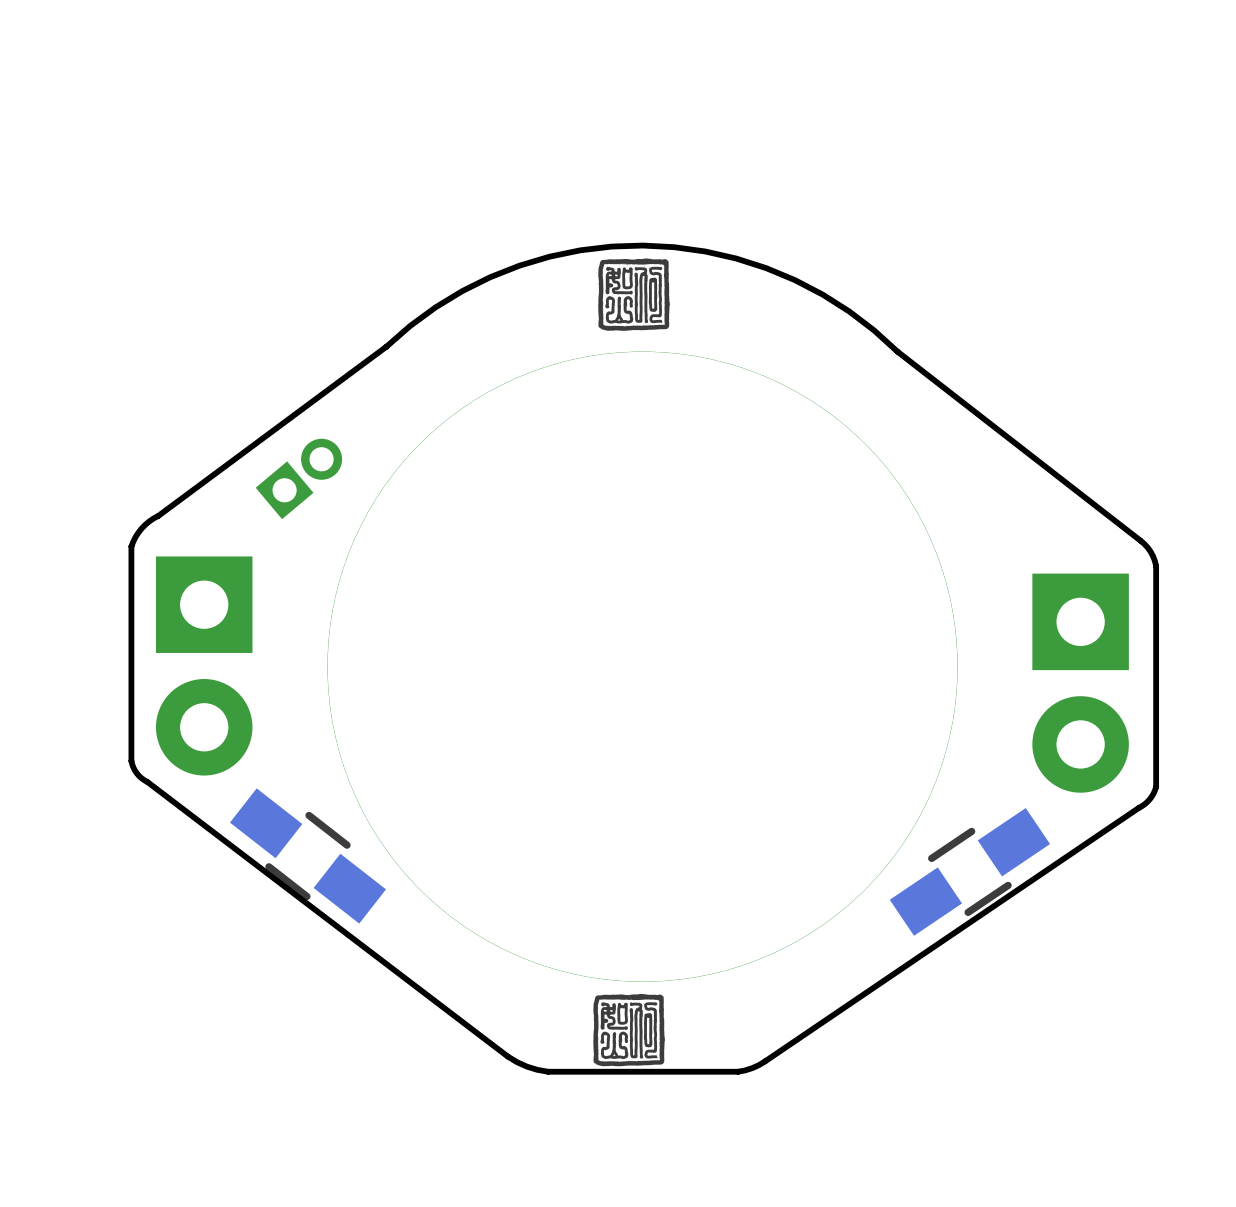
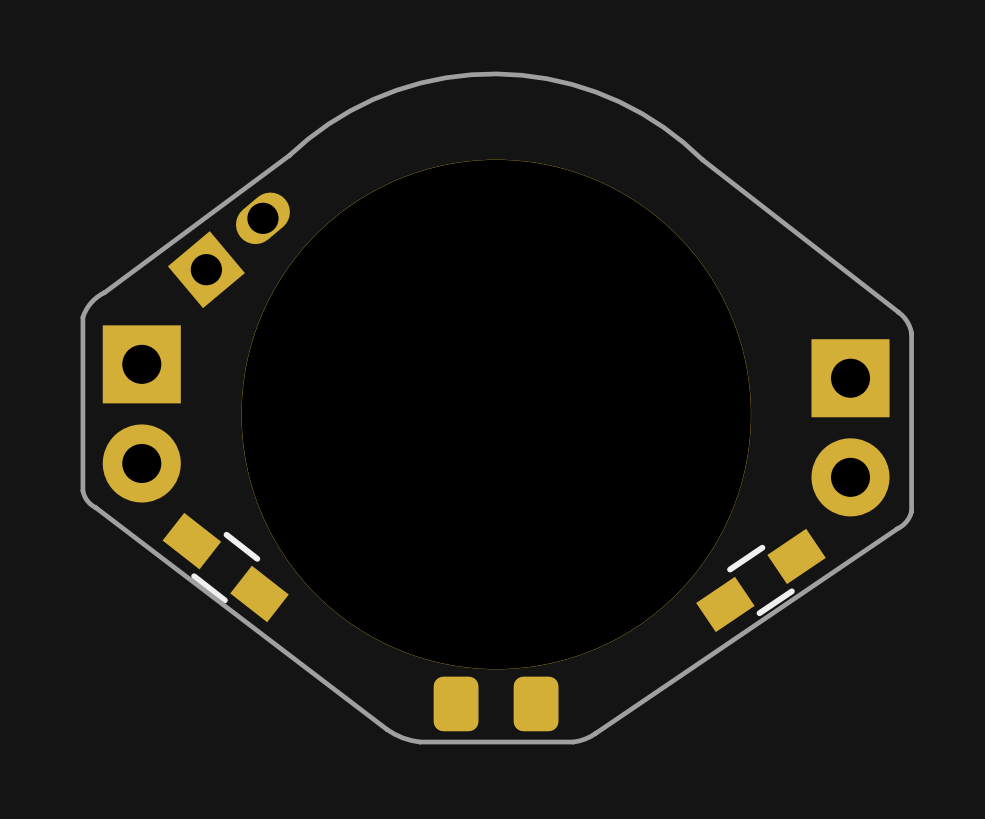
drawing: [598, 258, 670, 331] -> none
part footprint: [255, 438, 343, 520] -> [167, 192, 290, 309]
drawing: [593, 993, 665, 1067] -> none
part: none -> (496, 703)

